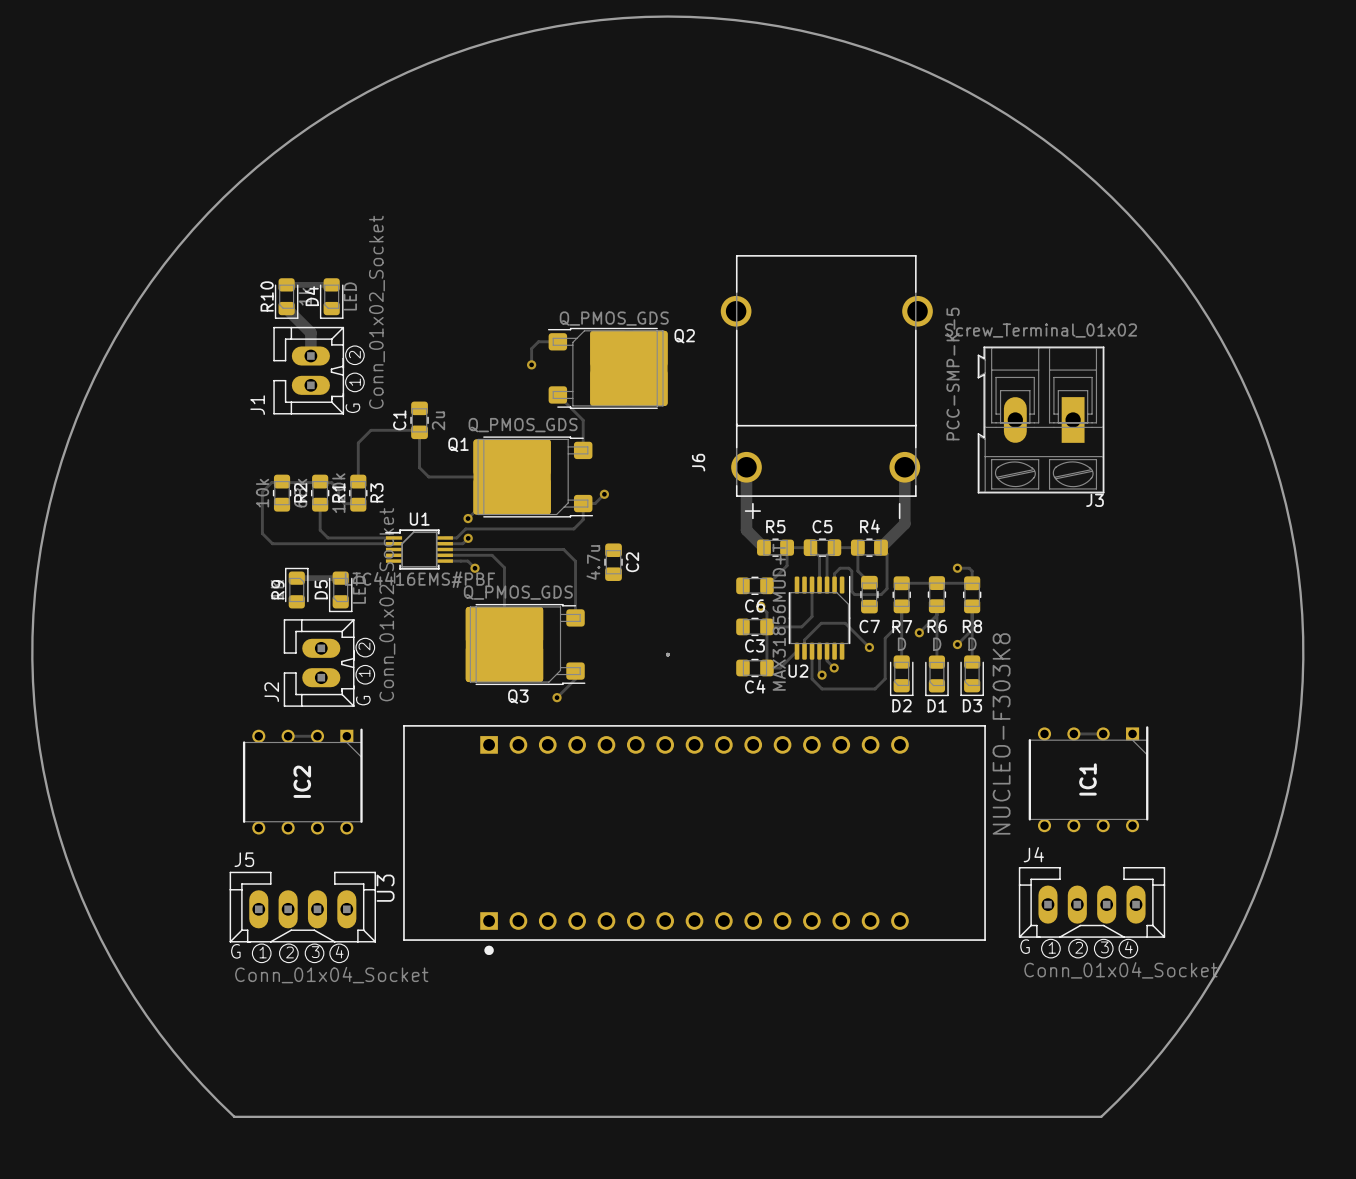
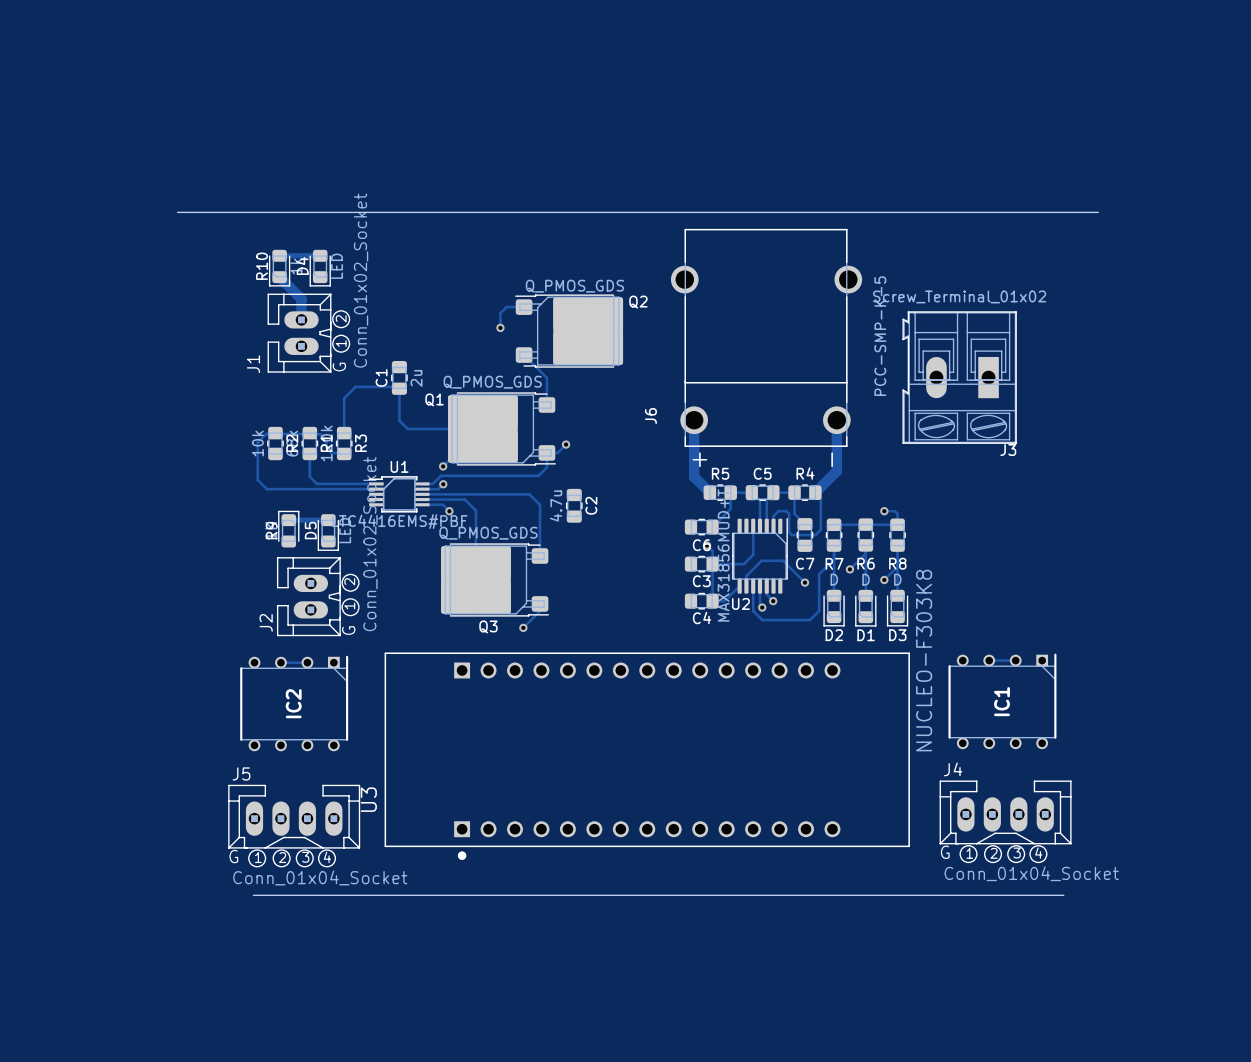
board edge: none -> (177, 212) (1098, 212)
round board edge: [666, 653, 669, 656] -> none
board edge: none -> (253, 895) (1063, 895)
board edge: (234, 1116) (1101, 1116) (1132, 1085) (1175, 1033) (1213, 978) (1234, 939) (1261, 877) (1282, 814) (1295, 748) (1302, 681) (1302, 614) (1294, 548) (1280, 482) (1259, 419) (1241, 378) (1209, 319) (1171, 264) (1142, 229) (1095, 182) (1043, 139) (987, 102) (928, 72) (886, 55) (822, 35) (778, 26) (712, 18) (645, 16) (578, 22) (534, 30) (470, 48) (407, 72) (347, 102) (291, 139) (240, 182) (208, 213) (164, 264) (126, 319) (94, 378) (68, 440) (49, 504) (37, 570) (33, 614) (33, 681) (36, 726) (47, 792) (66, 856) (91, 919) (122, 978) (146, 1015) (187, 1068) (234, 1116) -> none

